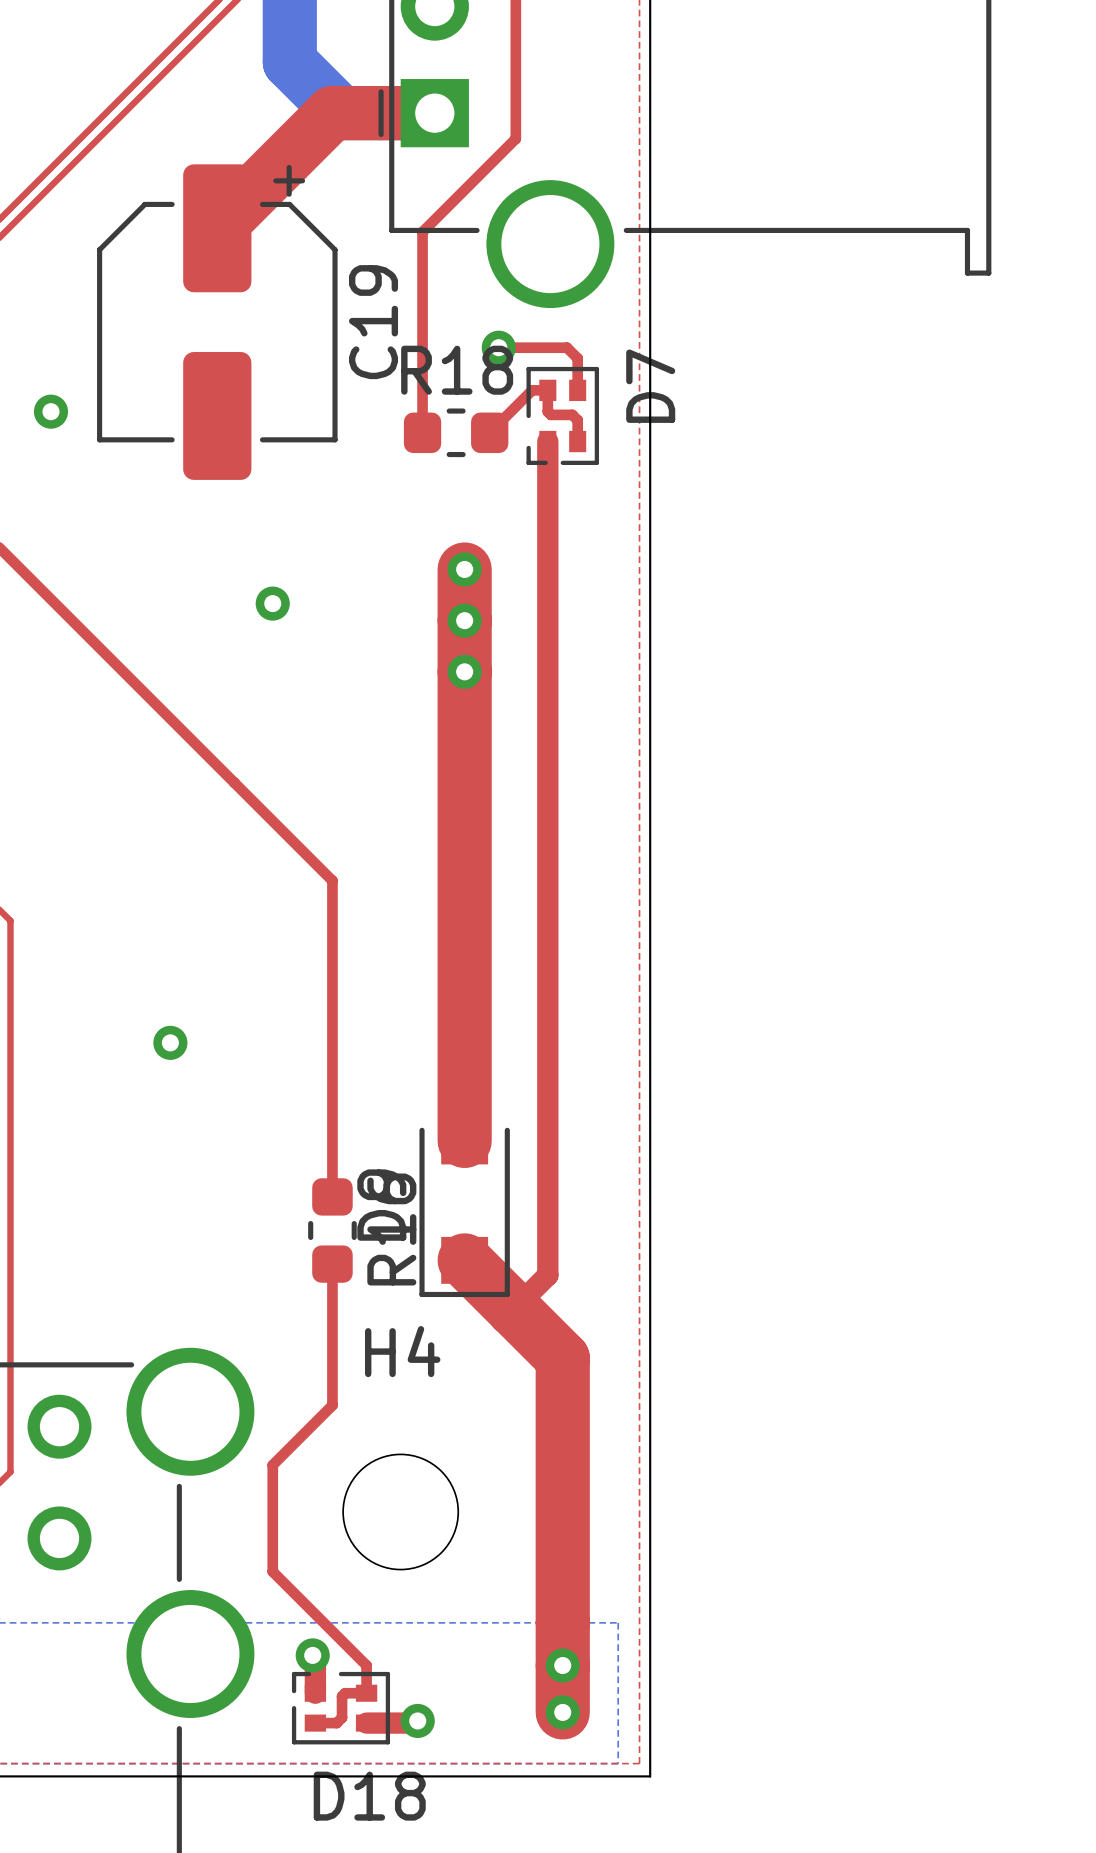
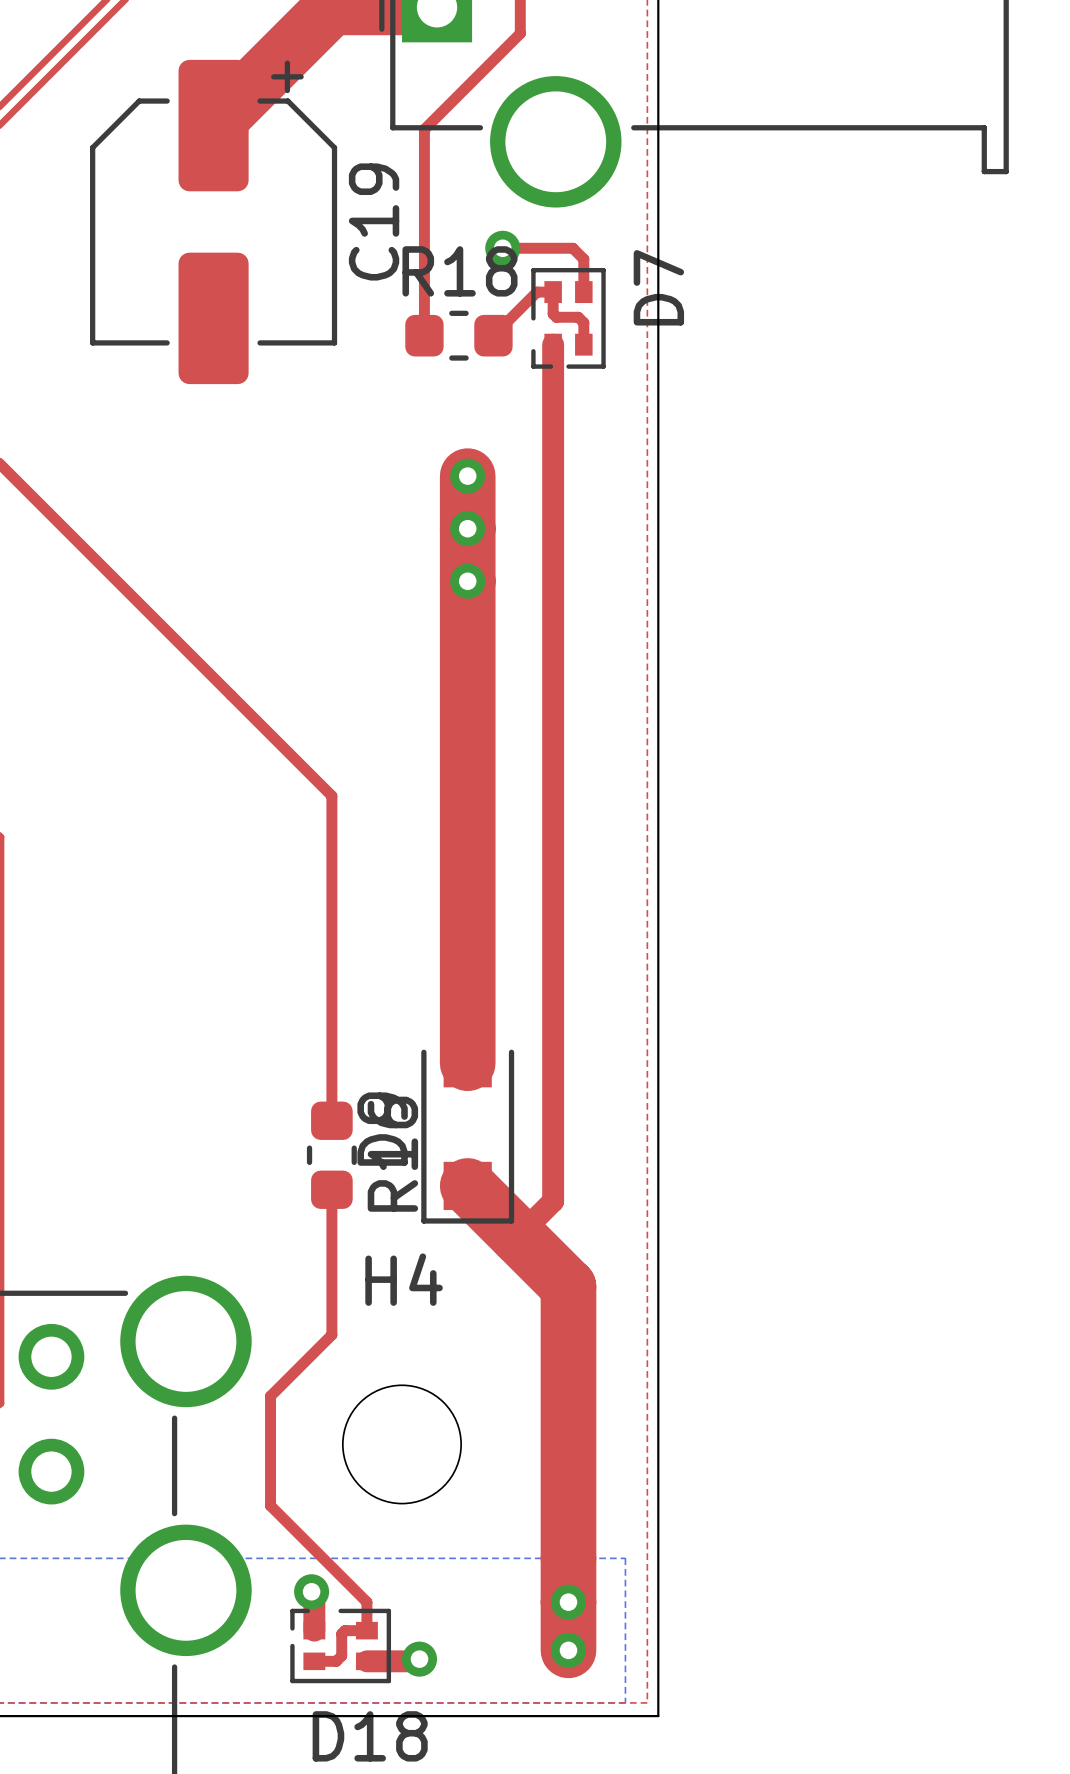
via: (50, 411) -> none
via: (272, 603) -> none
via: (170, 1042) -> none

